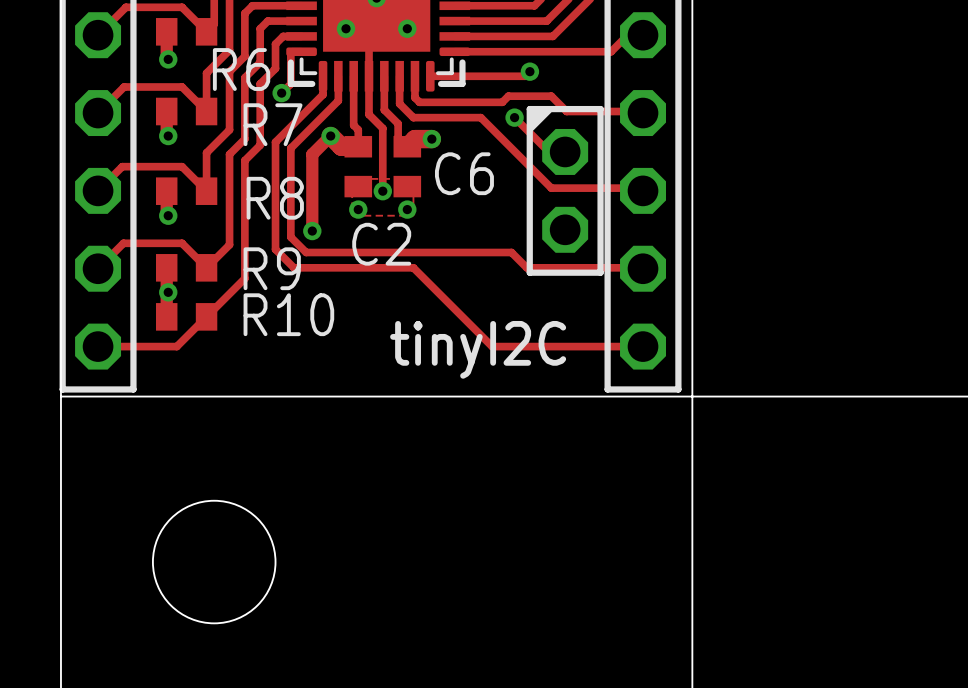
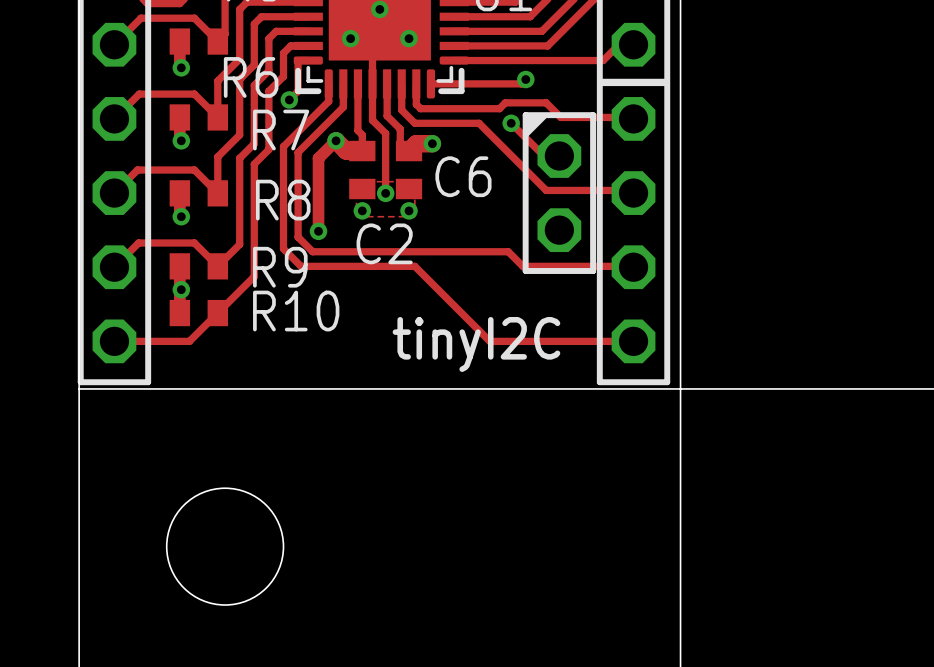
line: none -> (601, 82) (665, 82)

